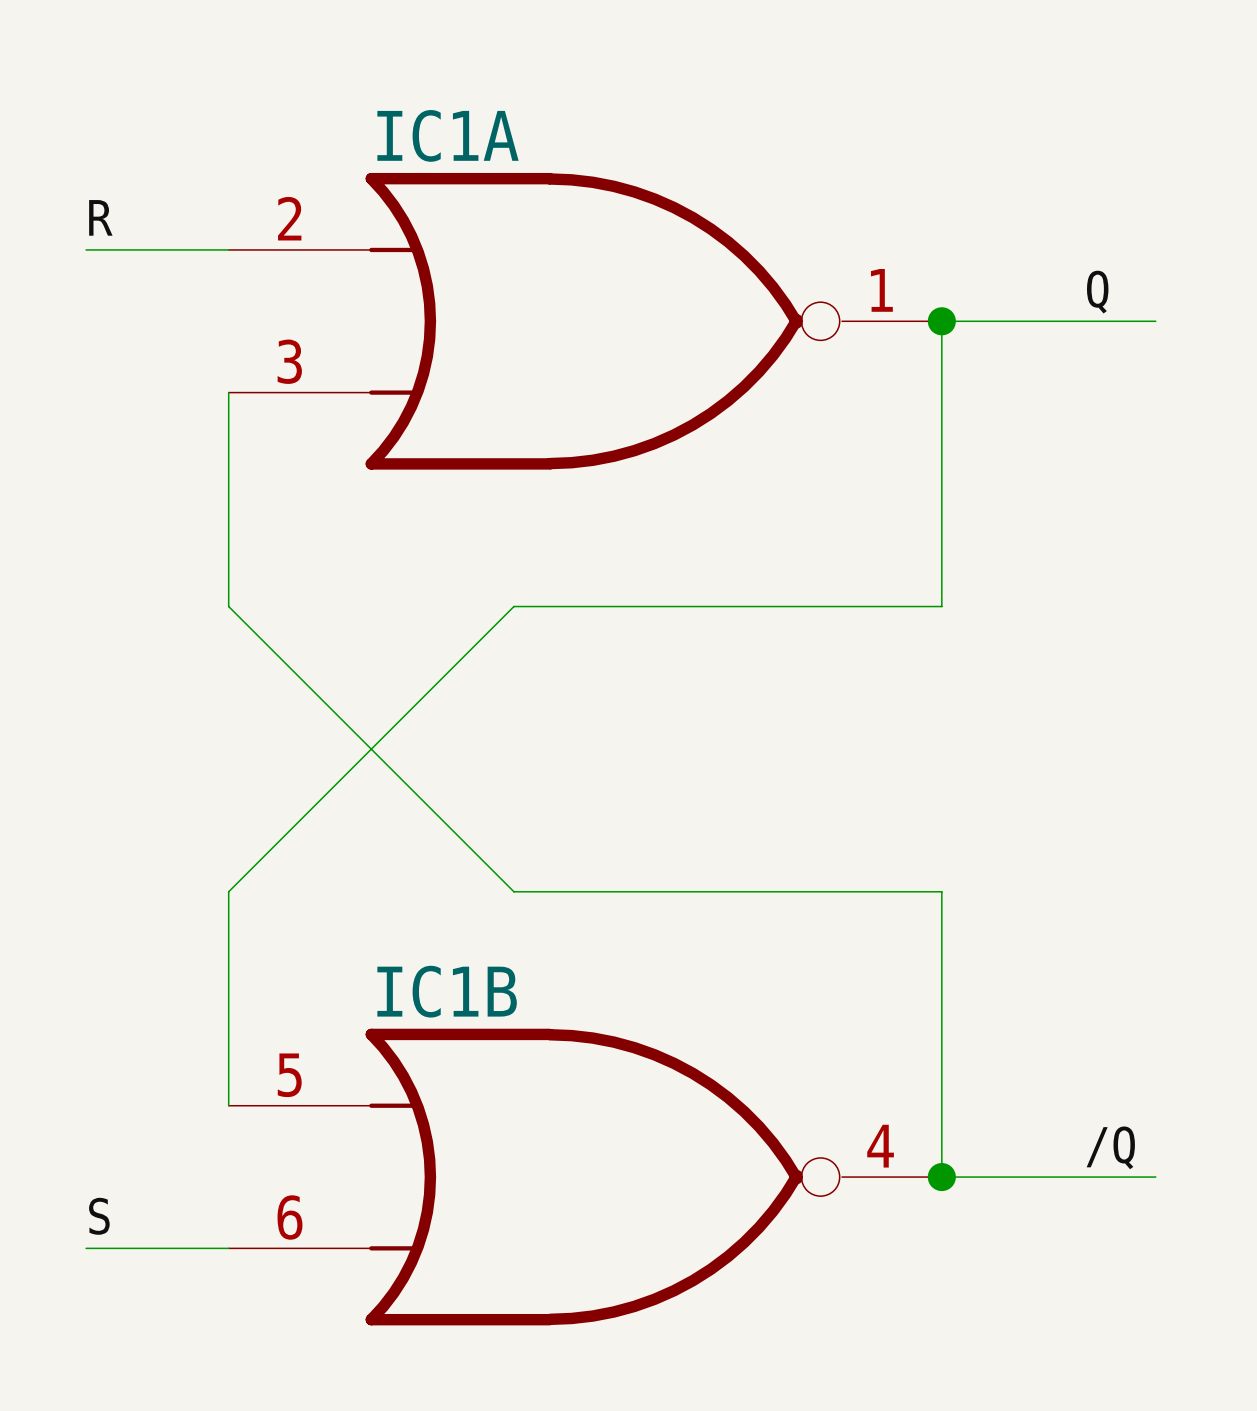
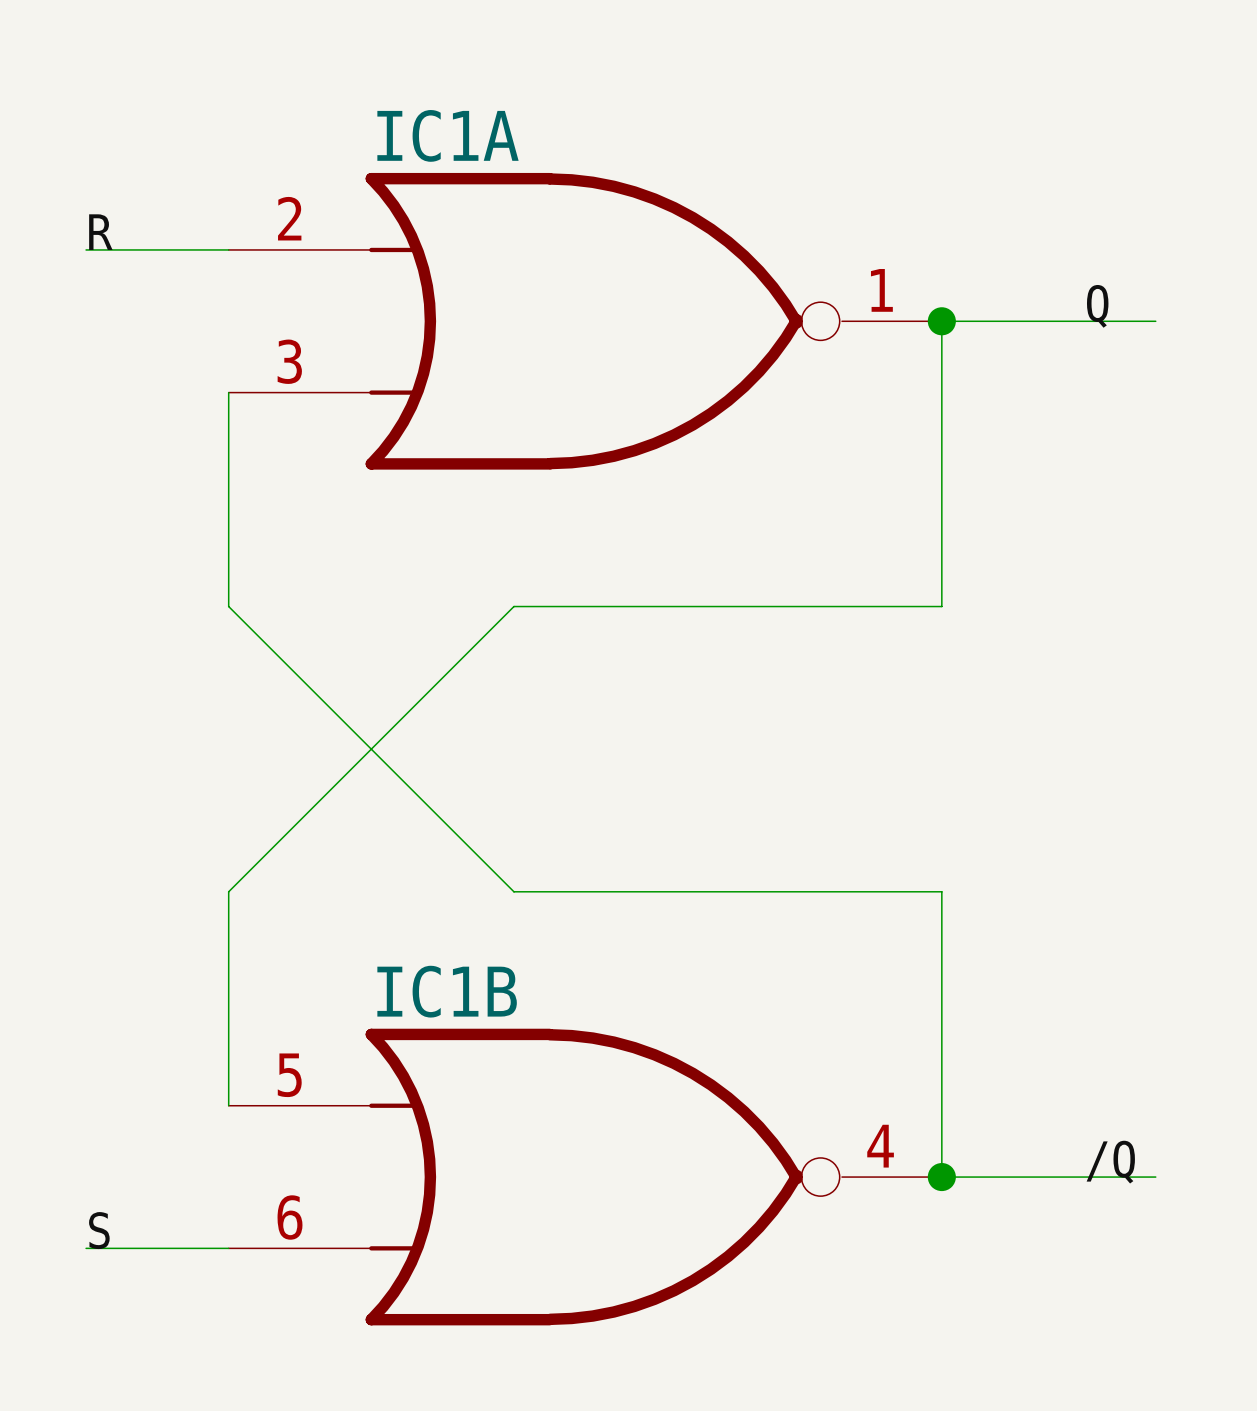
label position: R (100, 217) -> R (100, 232)
label position: Q (1097, 292) -> Q (1097, 306)
label position: /Q (1110, 1147) -> /Q (1110, 1162)
label position: S (99, 1216) -> S (99, 1230)

